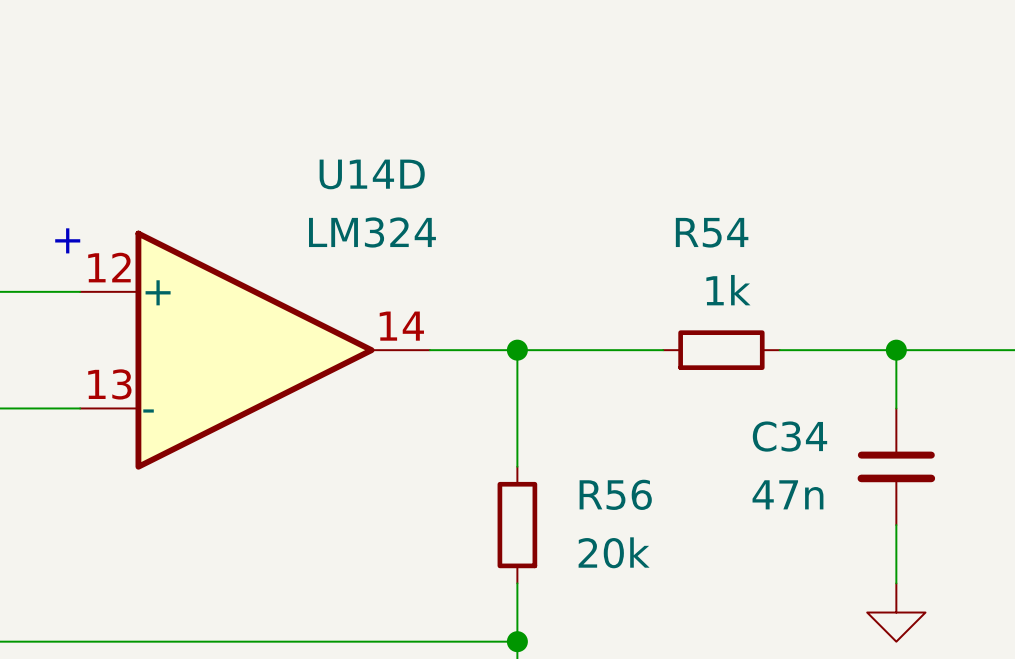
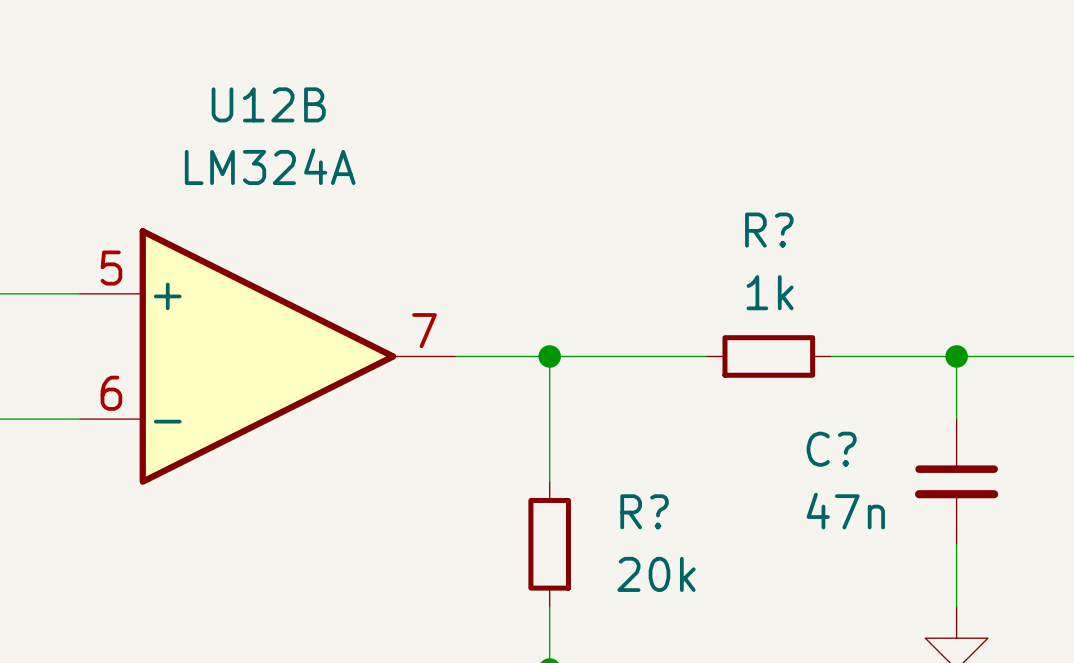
U14D name: U14D (372, 174) -> U12B (268, 104)
U14D value: LM324 (372, 232) -> LM324A (270, 166)
R54 name: R54 (712, 232) -> R? (769, 230)
text: + (67, 240) -> none
U14D pin number: 12 (109, 267) -> 5 (111, 268)
U14D pin number: 14 (401, 326) -> 7 (424, 330)
U14D pin number: 13 (109, 384) -> 6 (111, 393)
C34 name: C34 (789, 436) -> C? (831, 449)
R56 name: R56 (615, 494) -> R? (644, 511)

